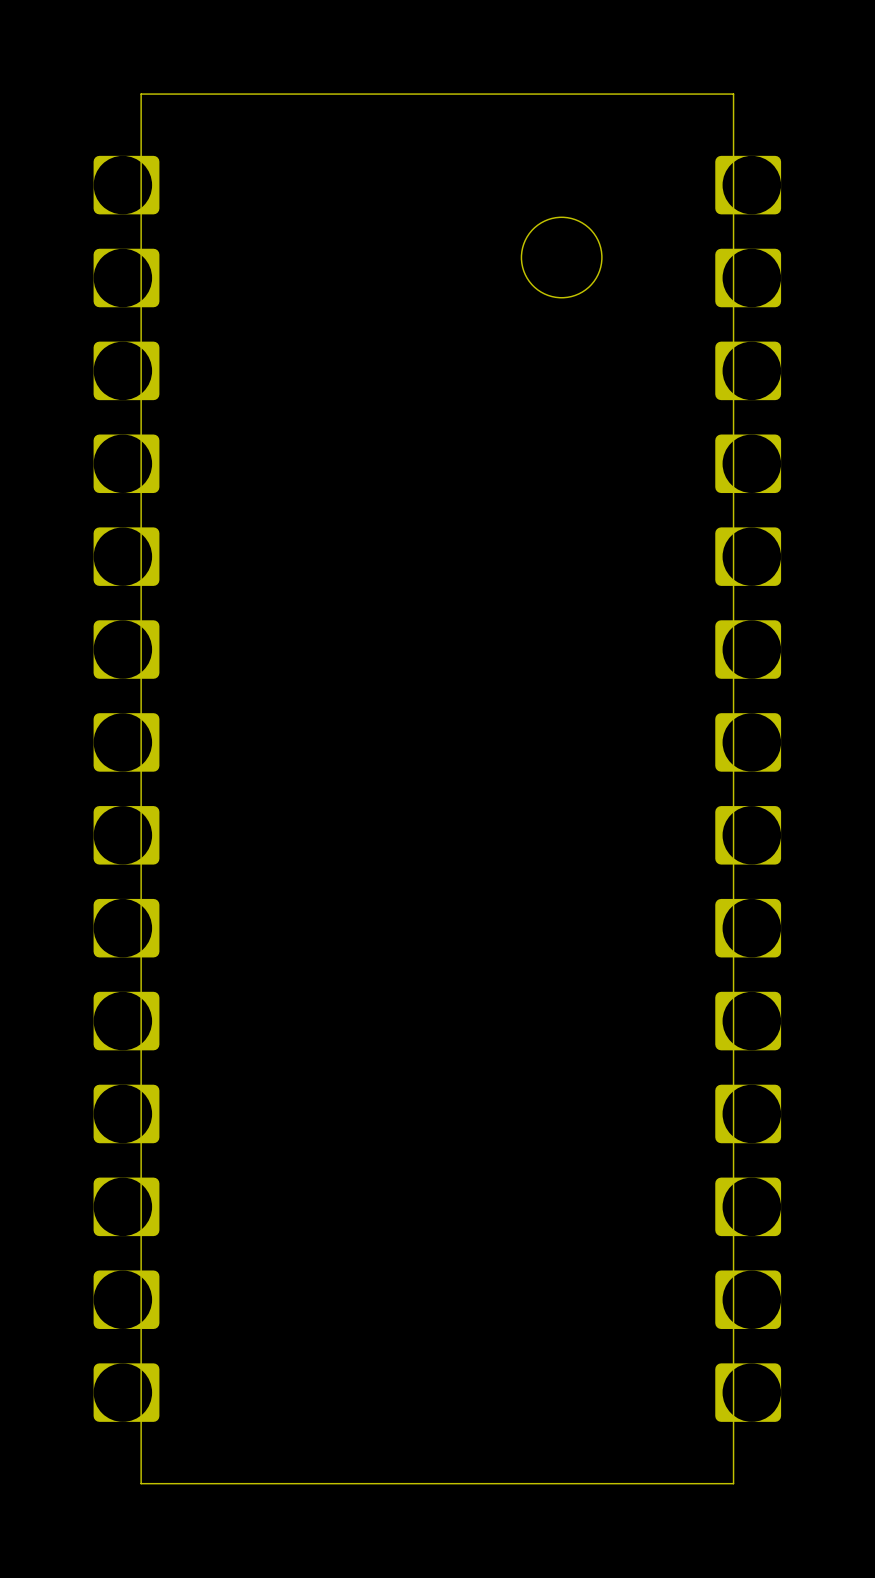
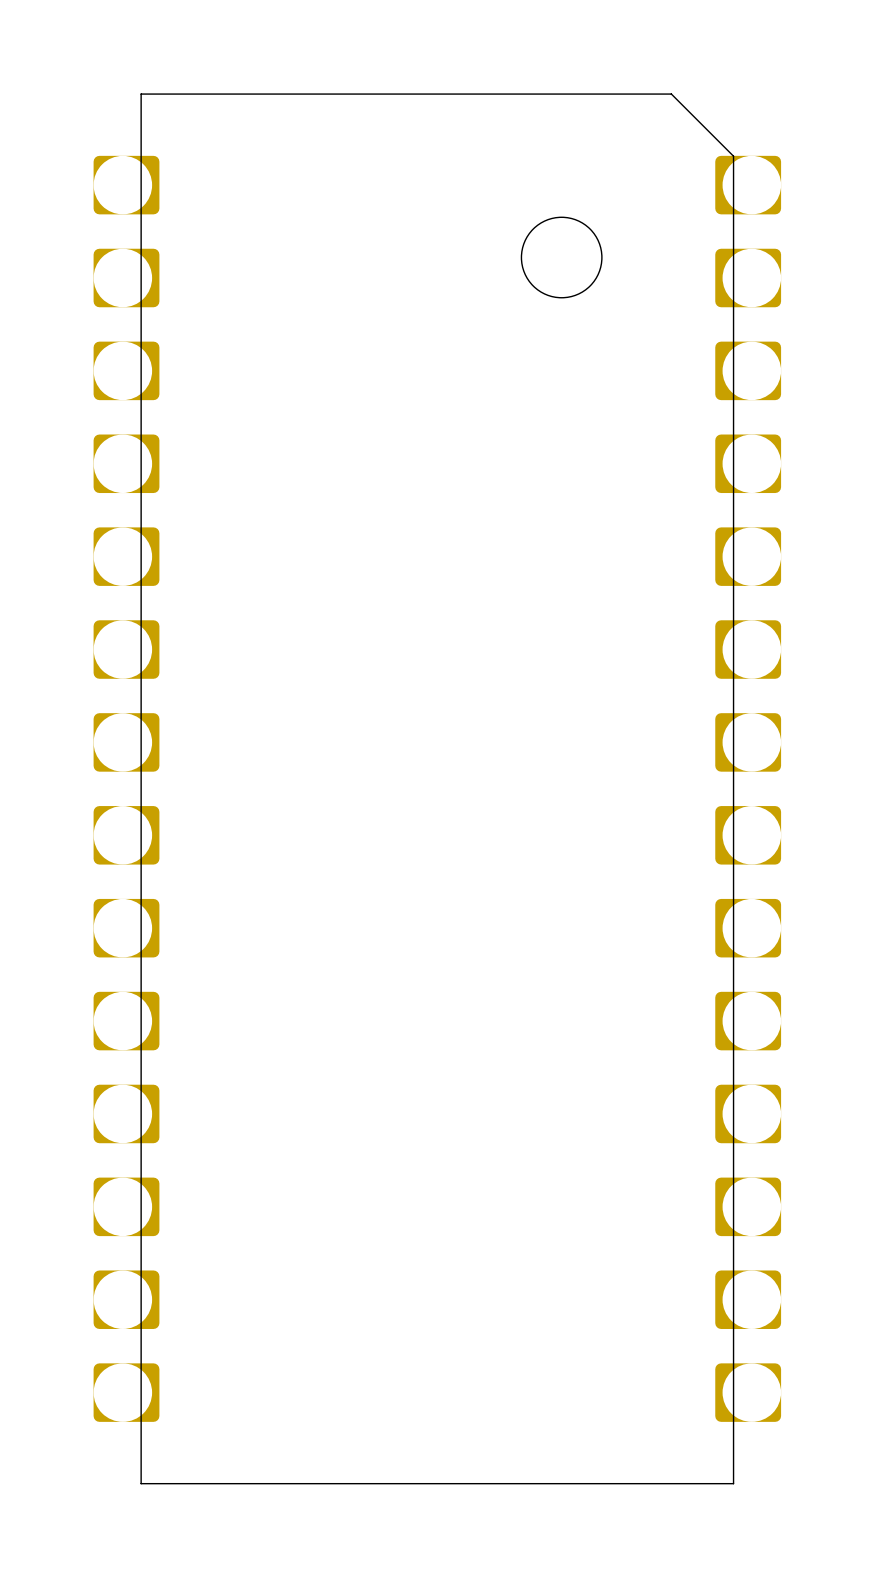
board edge: (671, 94) (733, 94) (733, 156) -> (671, 94) (733, 156)

